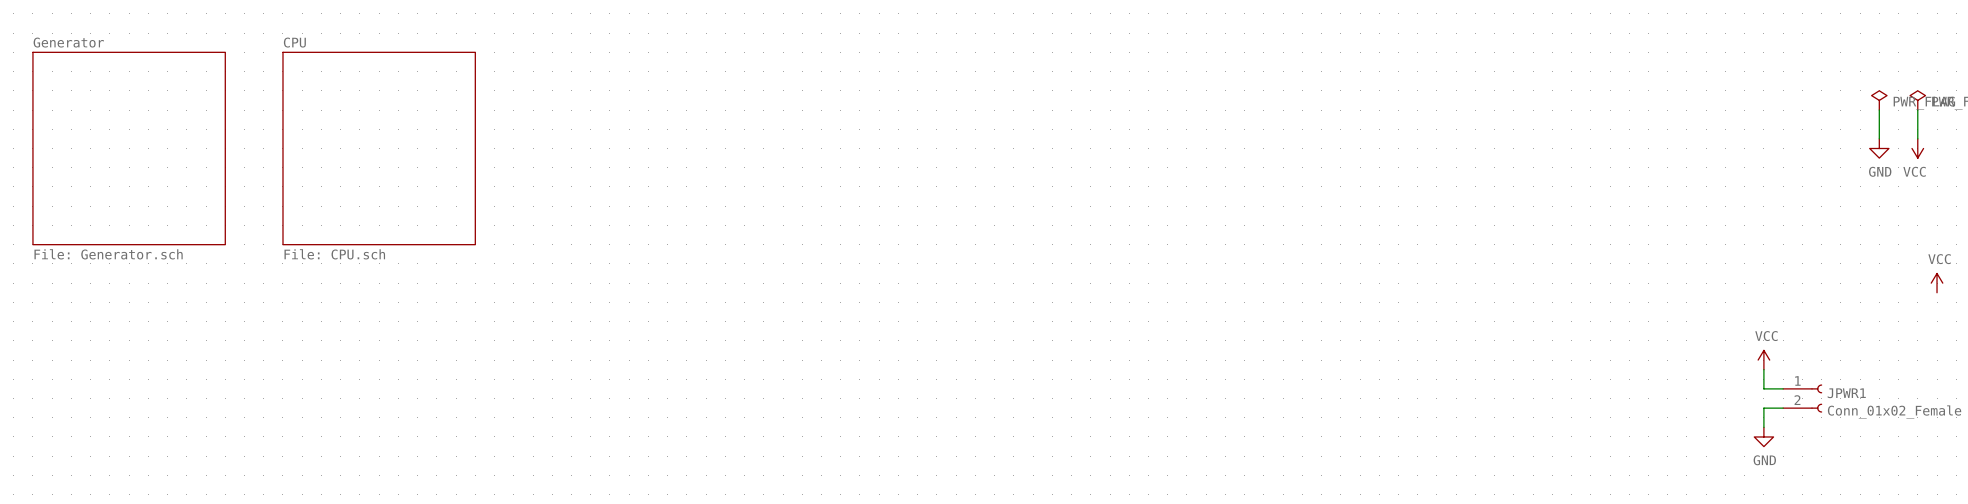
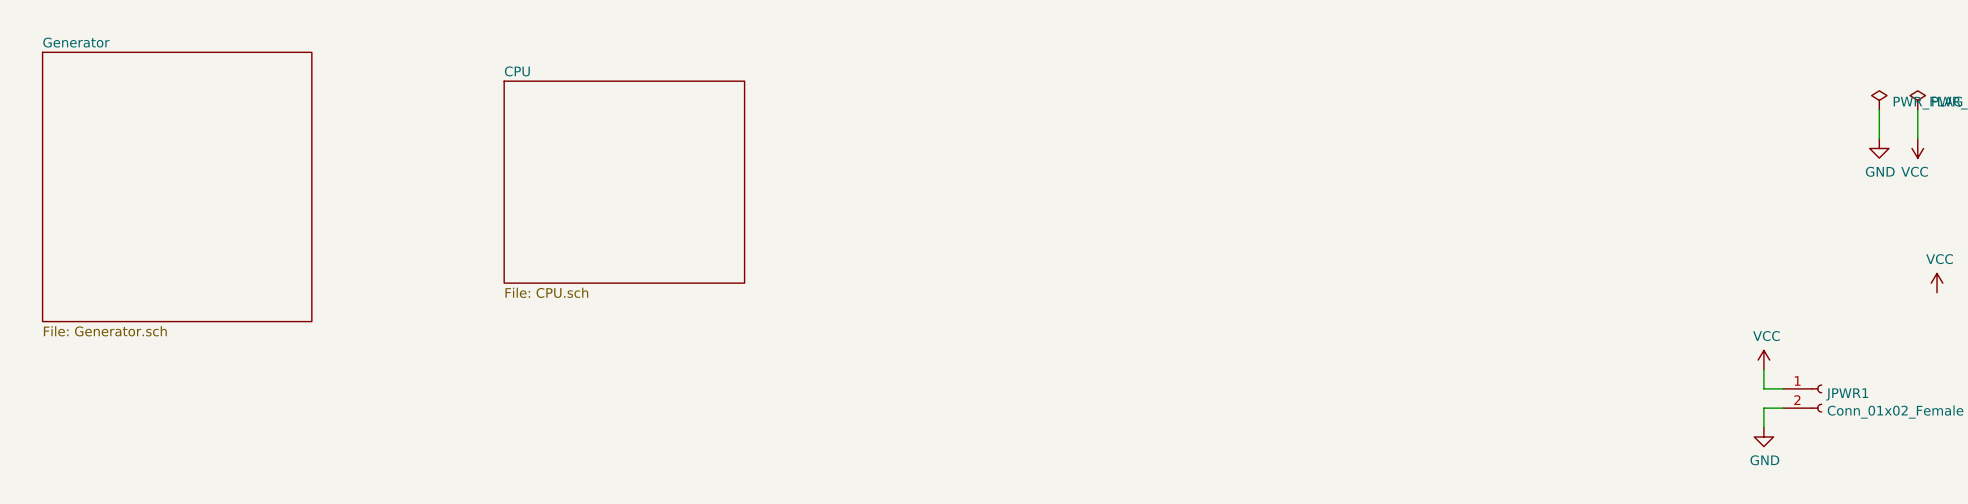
sheet Generator: File: Generator.sch (129, 148) -> none
sheet CPU: File: CPU.sch (379, 148) -> none
sheet CPU: none -> File: CPU.sch (624, 182)
sheet Generator: none -> File: Generator.sch (177, 186)

